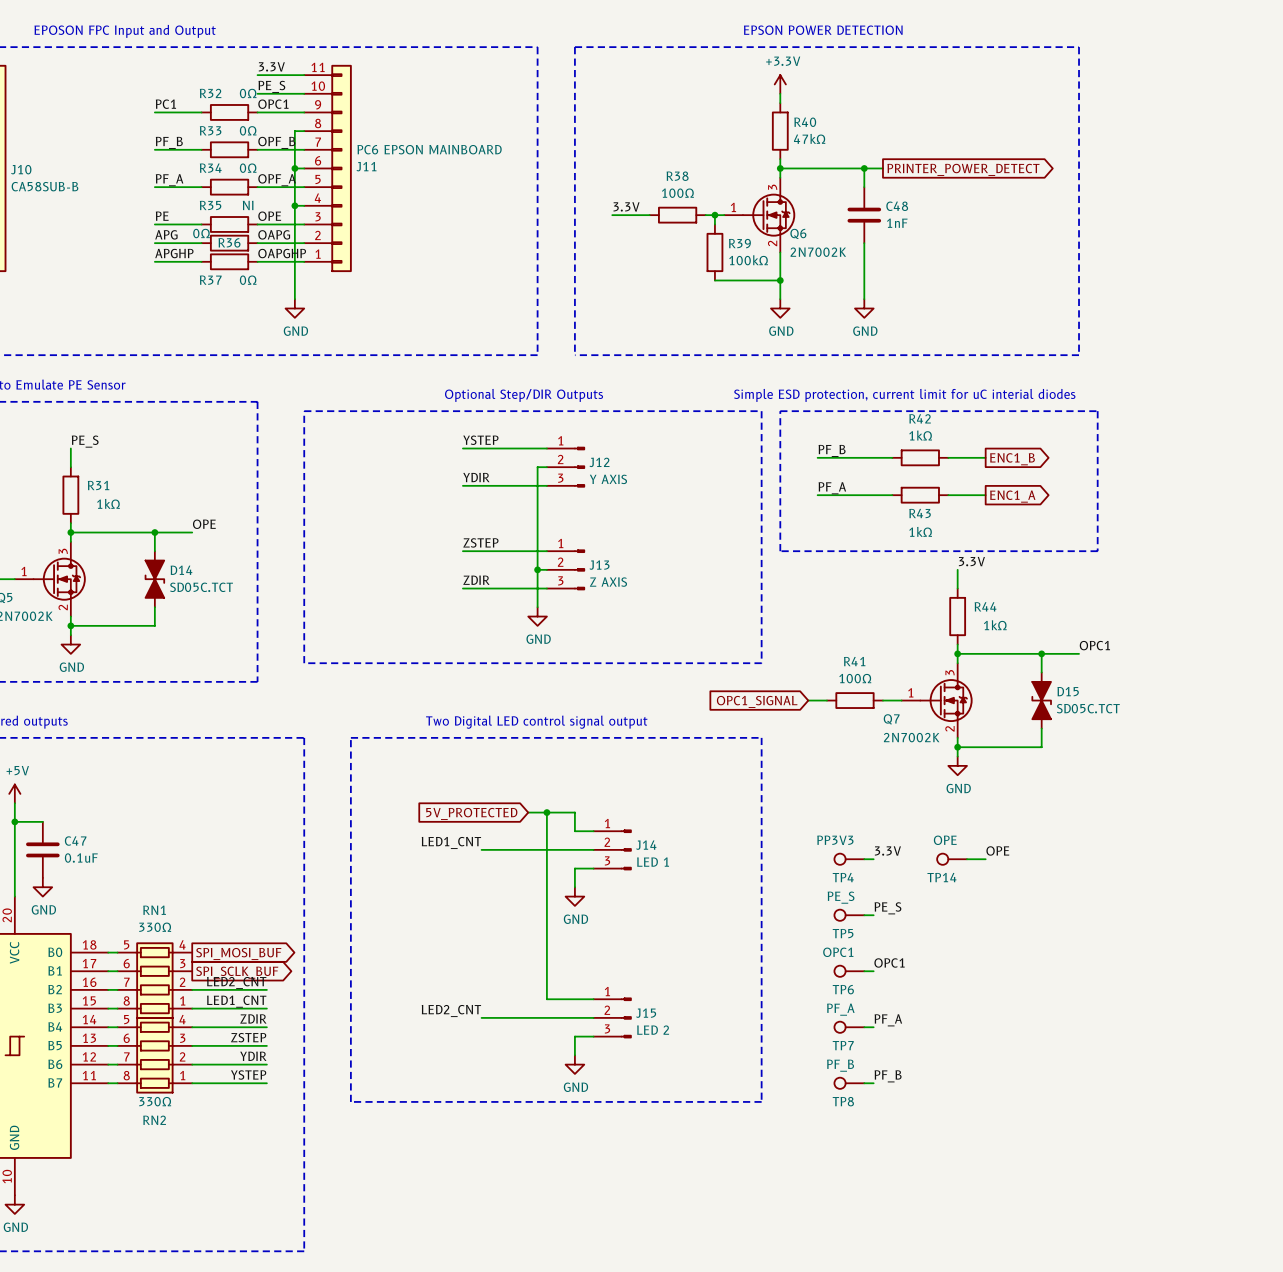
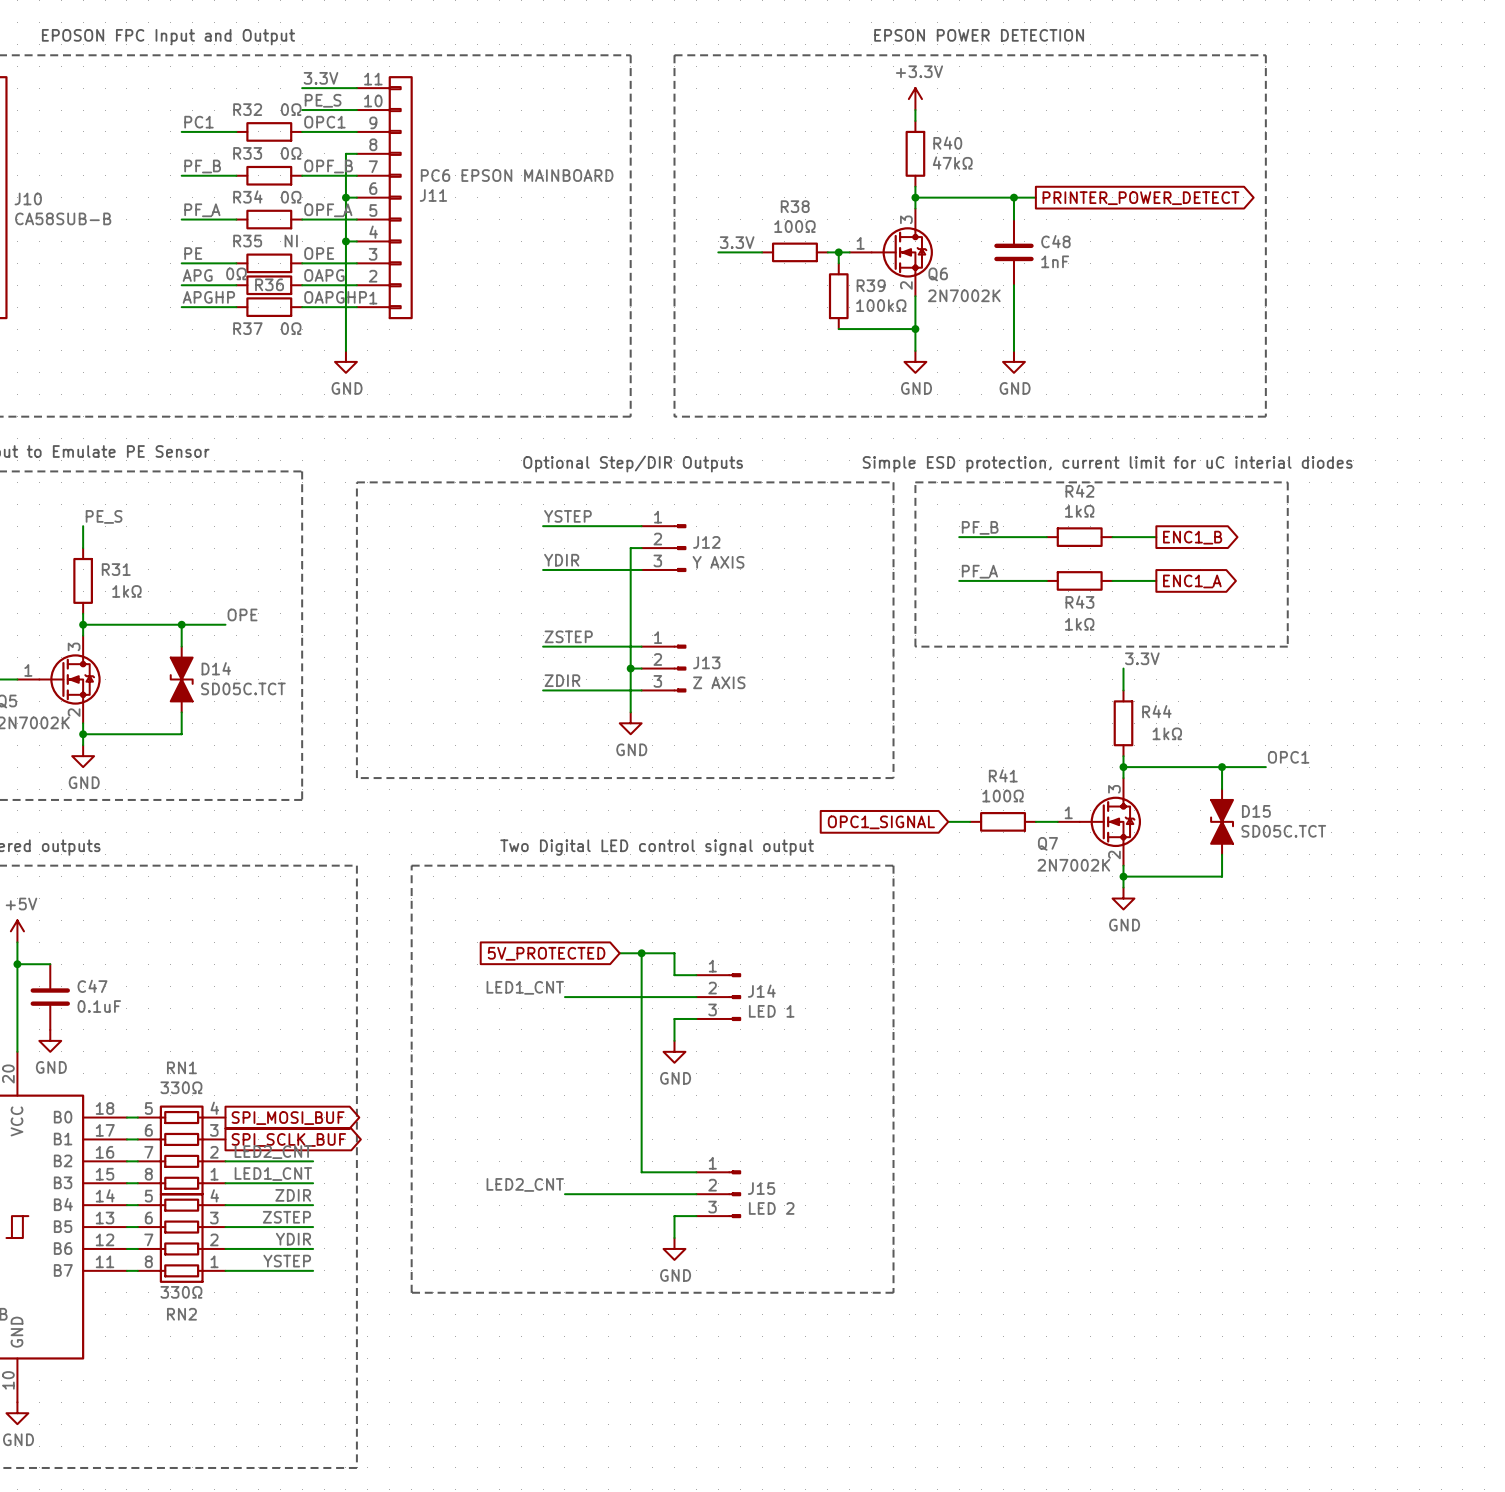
label: 3.3V (887, 850) -> none
label: OPE (997, 850) -> none
TP4: PP3V3 (849, 859) -> none
wire: (864, 859) (873, 859) -> none
TP14: OPE (952, 859) -> none
wire: (966, 859) (985, 859) -> none
label: PE_S (887, 908) -> none
TP5: PE_S (849, 915) -> none
wire: (864, 915) (873, 915) -> none
label: OPC1 (889, 962) -> none
TP6: OPC1 (849, 971) -> none
wire: (864, 971) (873, 971) -> none
label: PF_A (888, 1020) -> none
TP7: PF_A (849, 1027) -> none
wire: (864, 1027) (873, 1027) -> none
label: PF_B (888, 1076) -> none
TP8: PF_B (849, 1083) -> none
wire: (864, 1083) (873, 1083) -> none

